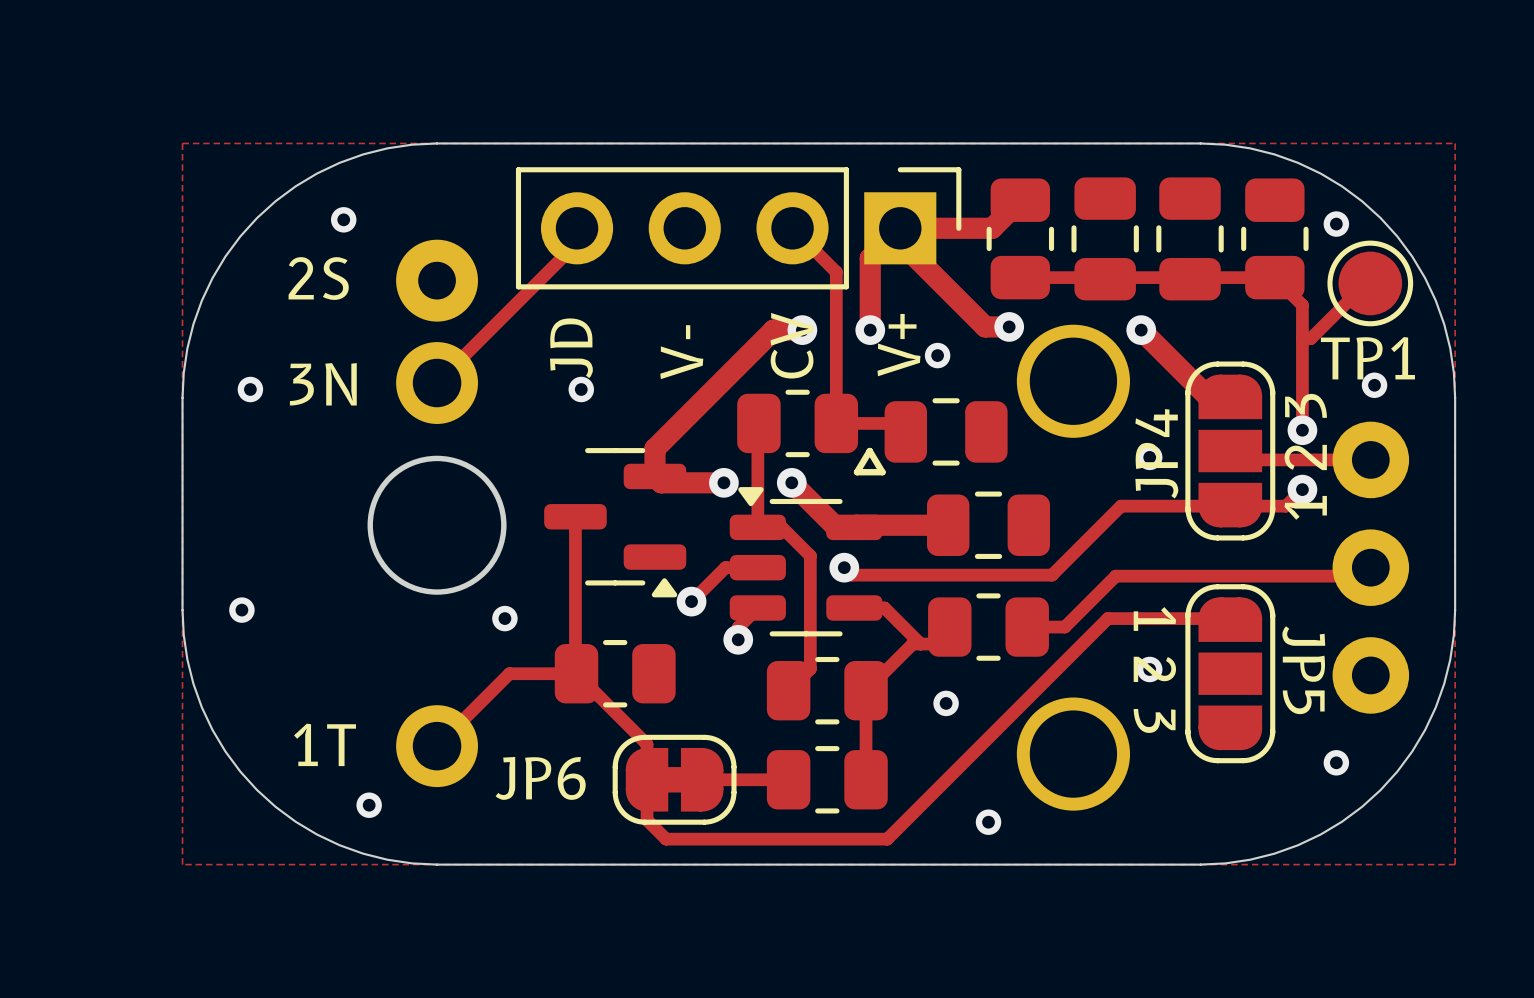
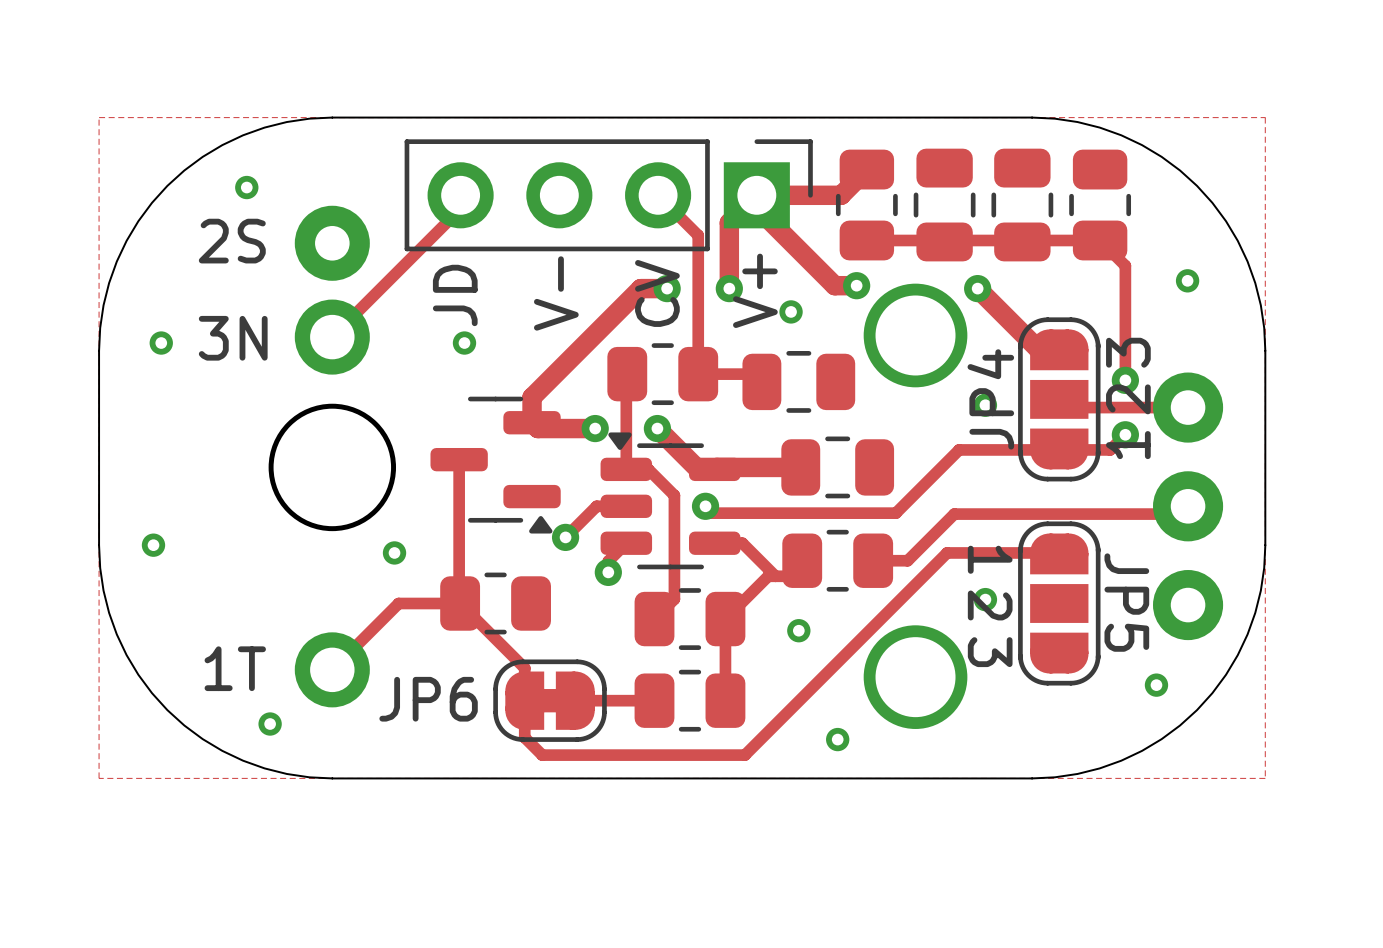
via: (1336, 224) -> none
track: (1370, 279) (1310, 338) (1302, 338) -> none
TP1: (1370, 283) -> none
via: none -> (1187, 280)
via: (1374, 385) -> none
line: (869, 451) (857, 472) (882, 472) (869, 451) -> none

